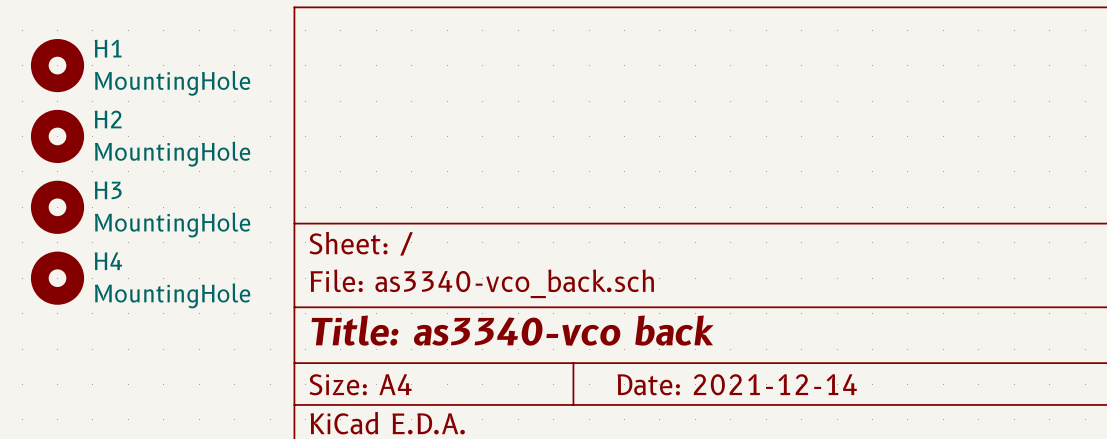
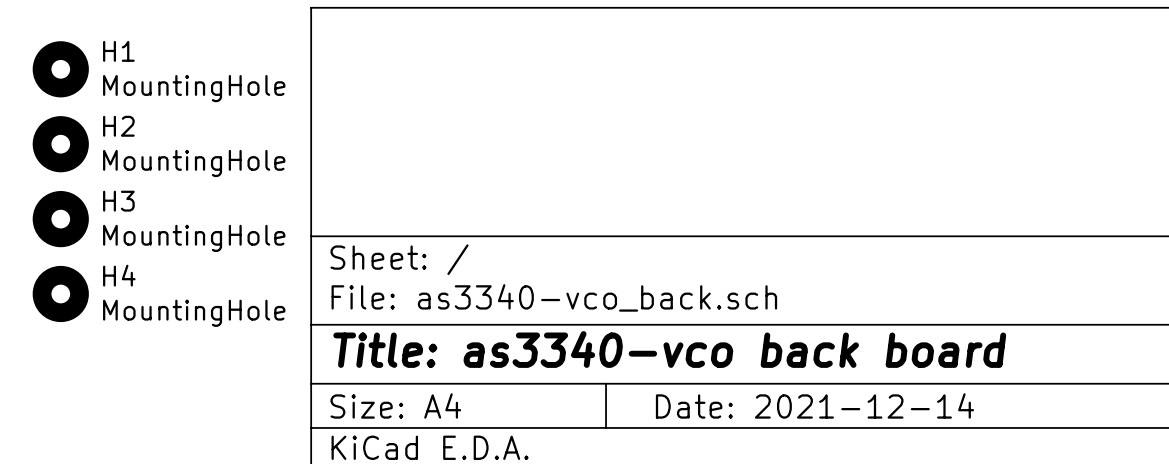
title block: Title: as3340-vco back (512, 330) -> Title: as3340-vco back board (669, 349)

